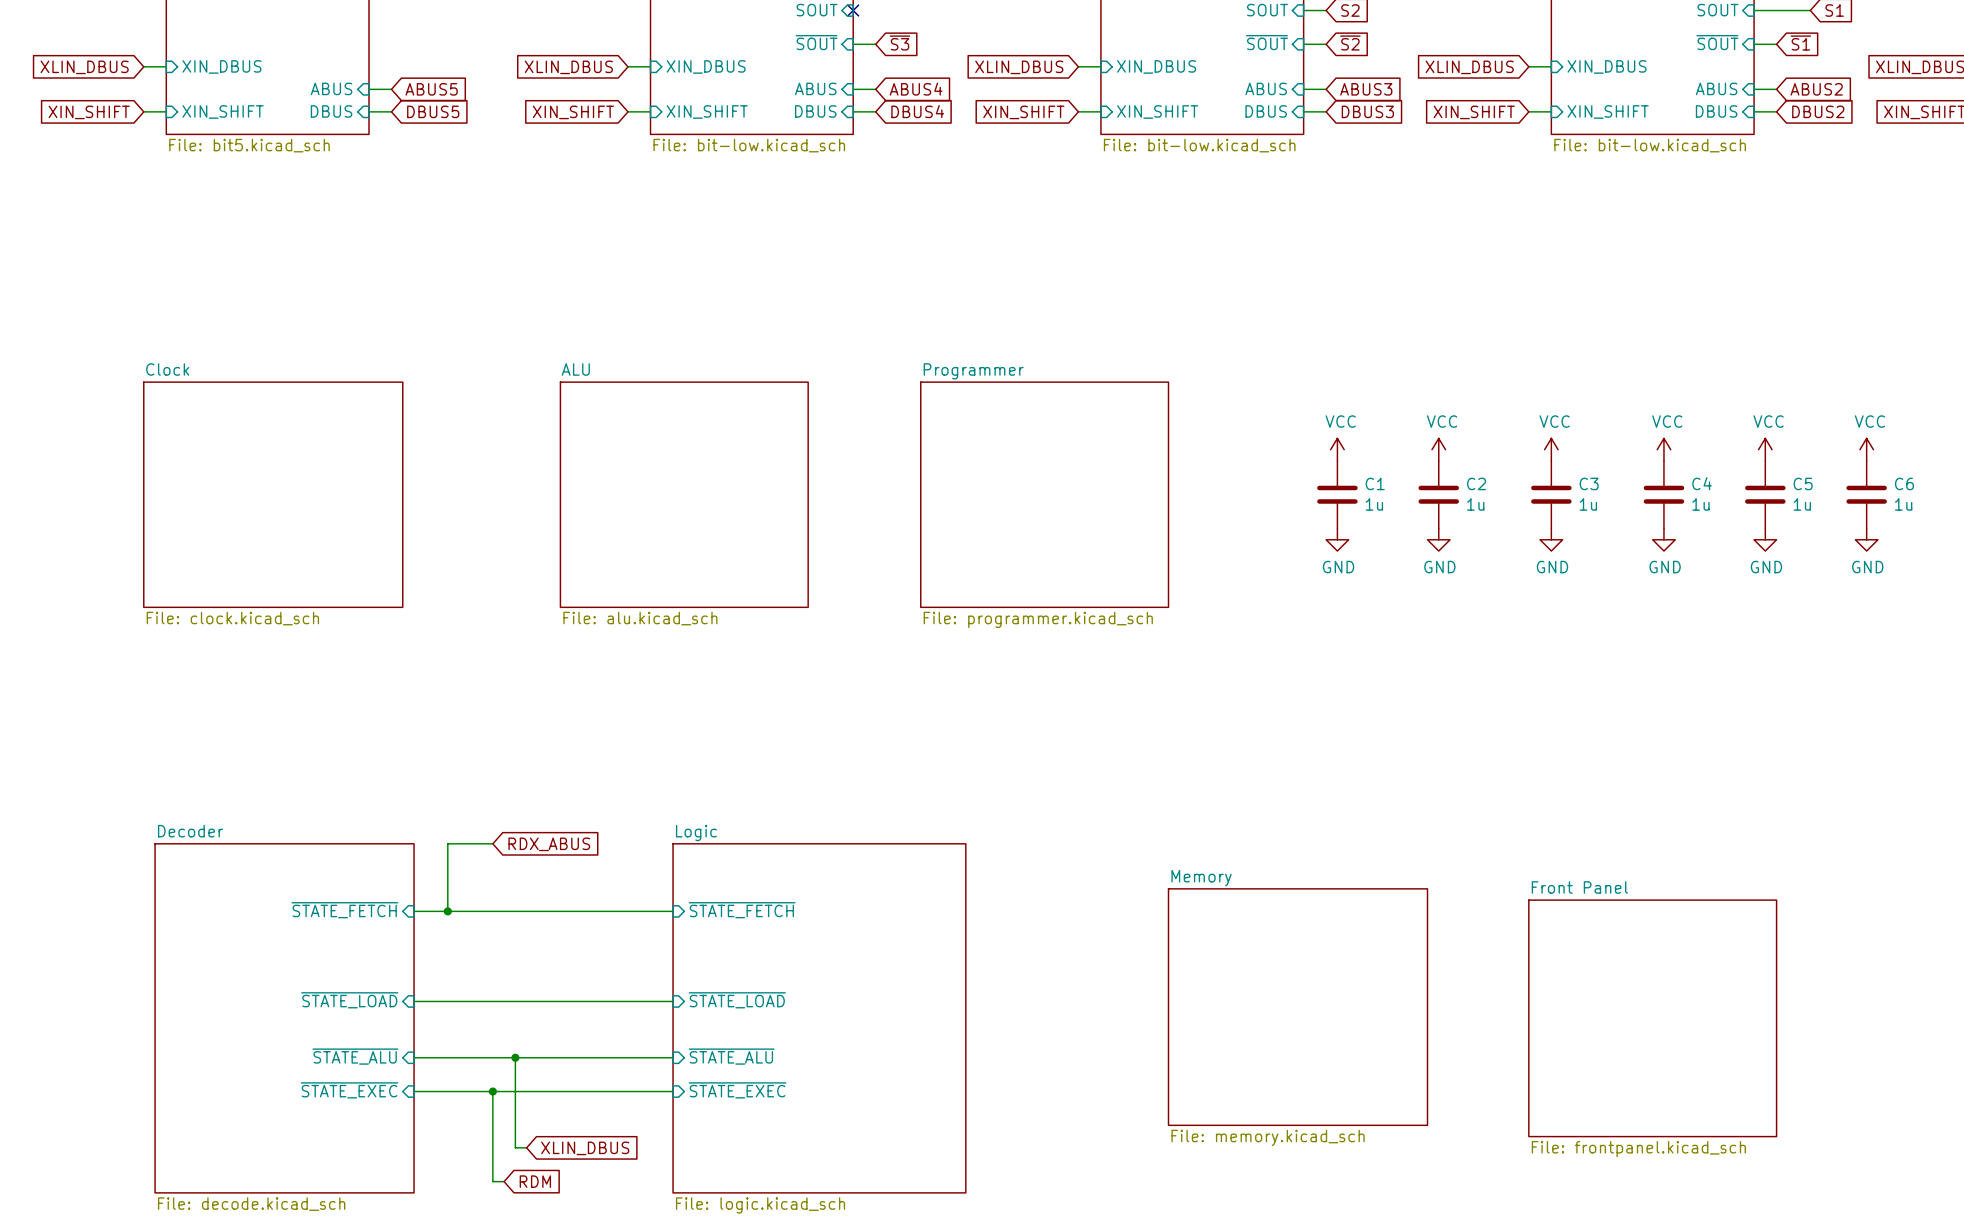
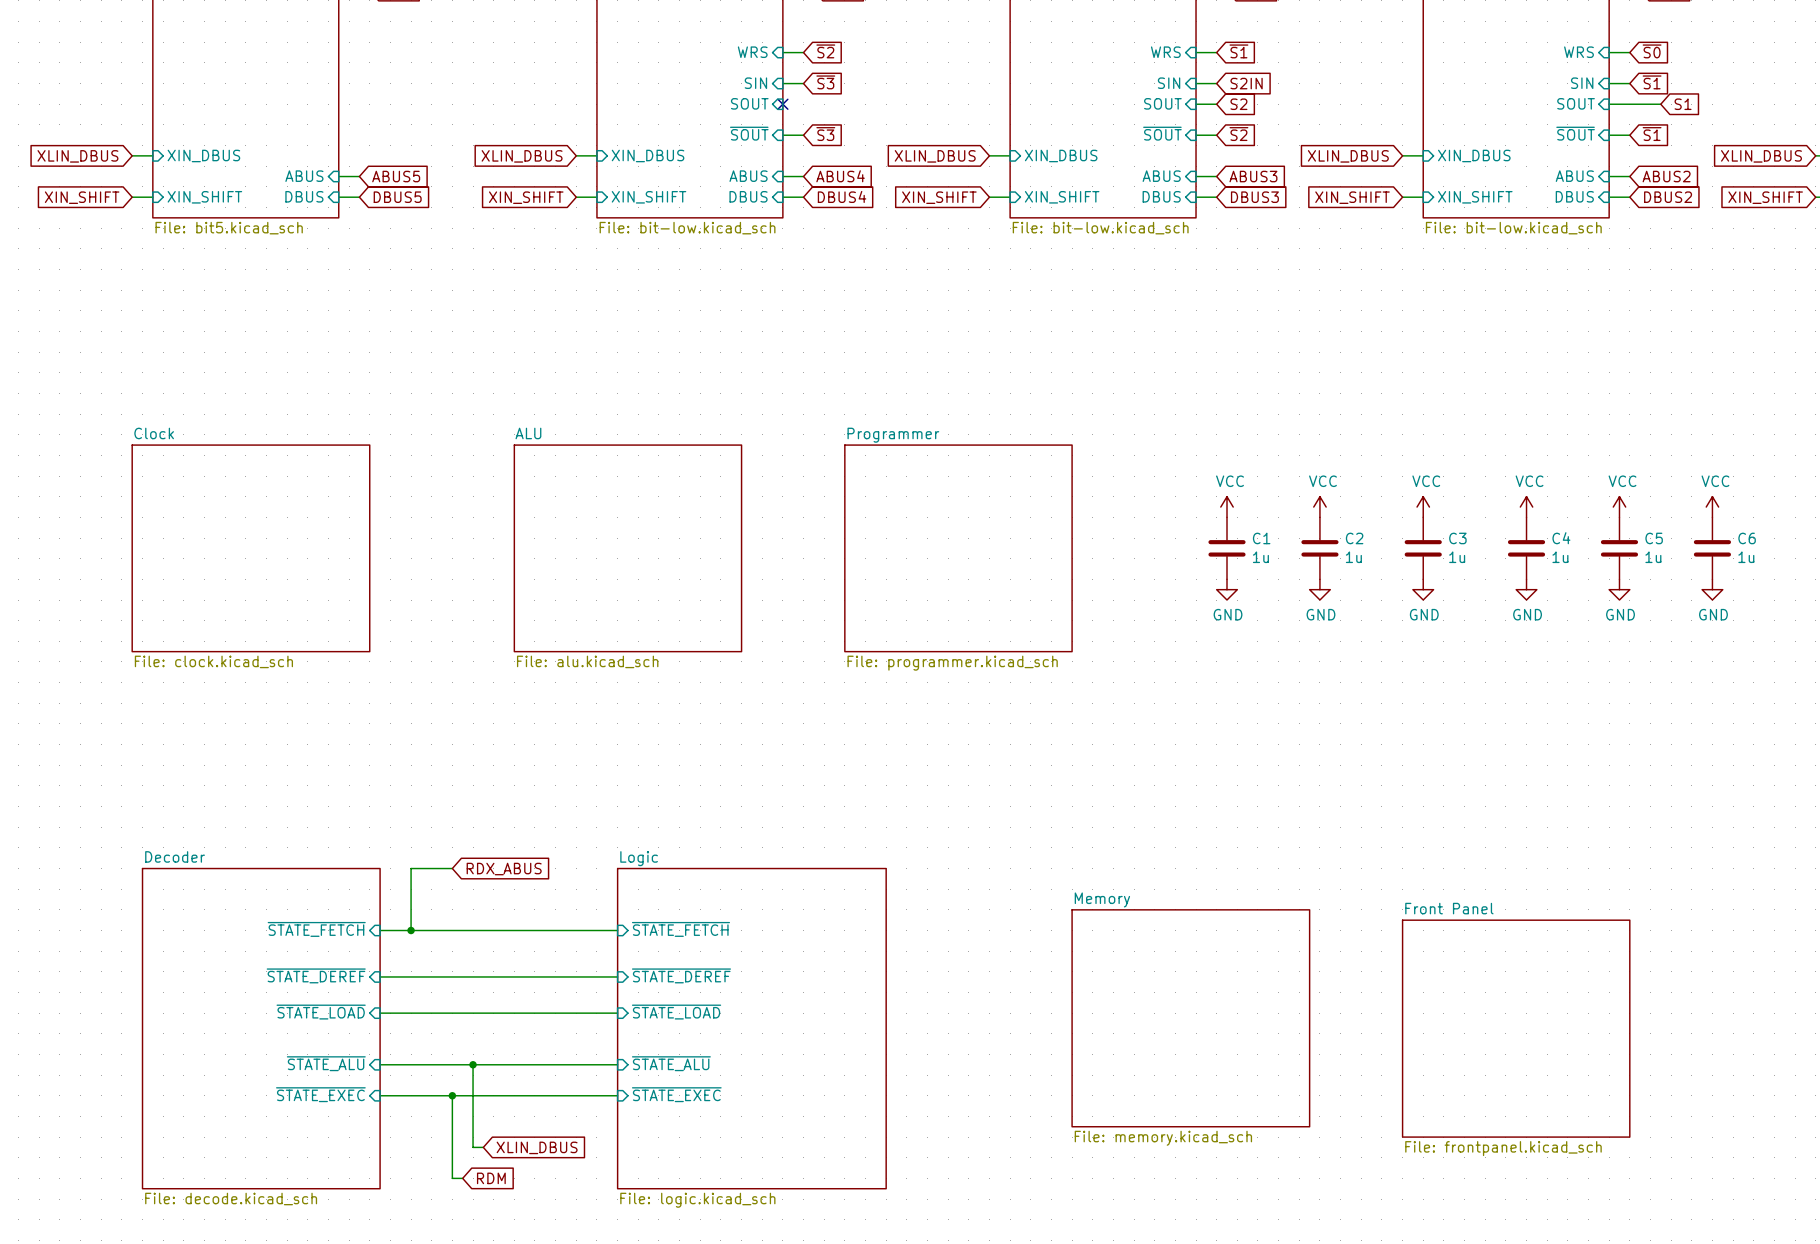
sheet pin: none -> ~{STATE_DEREF} (316, 975)
sheet pin: none -> ~{STATE_DEREF} (681, 975)
wire: none -> (380, 976) (617, 976)

